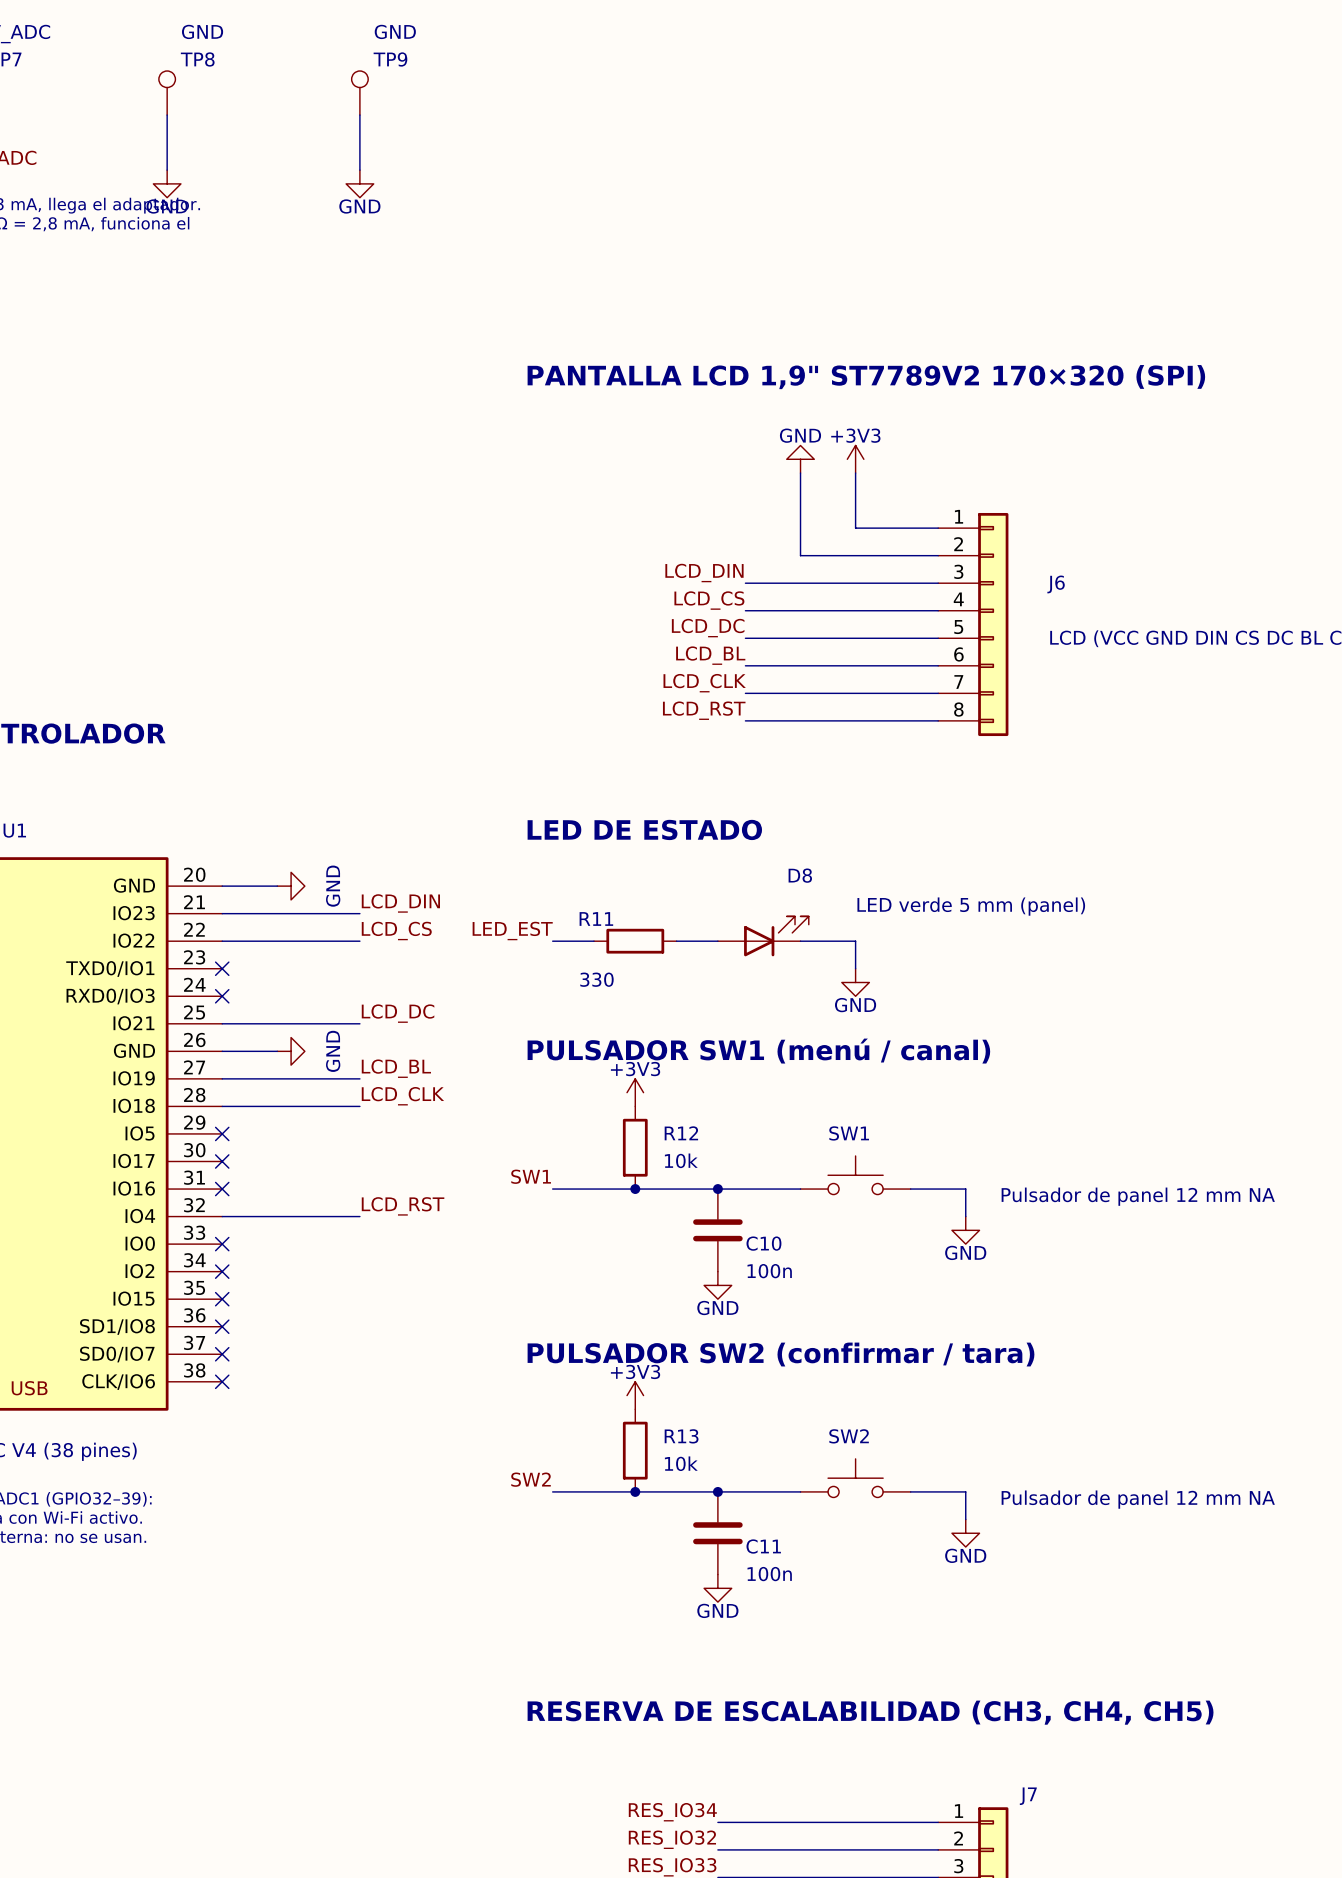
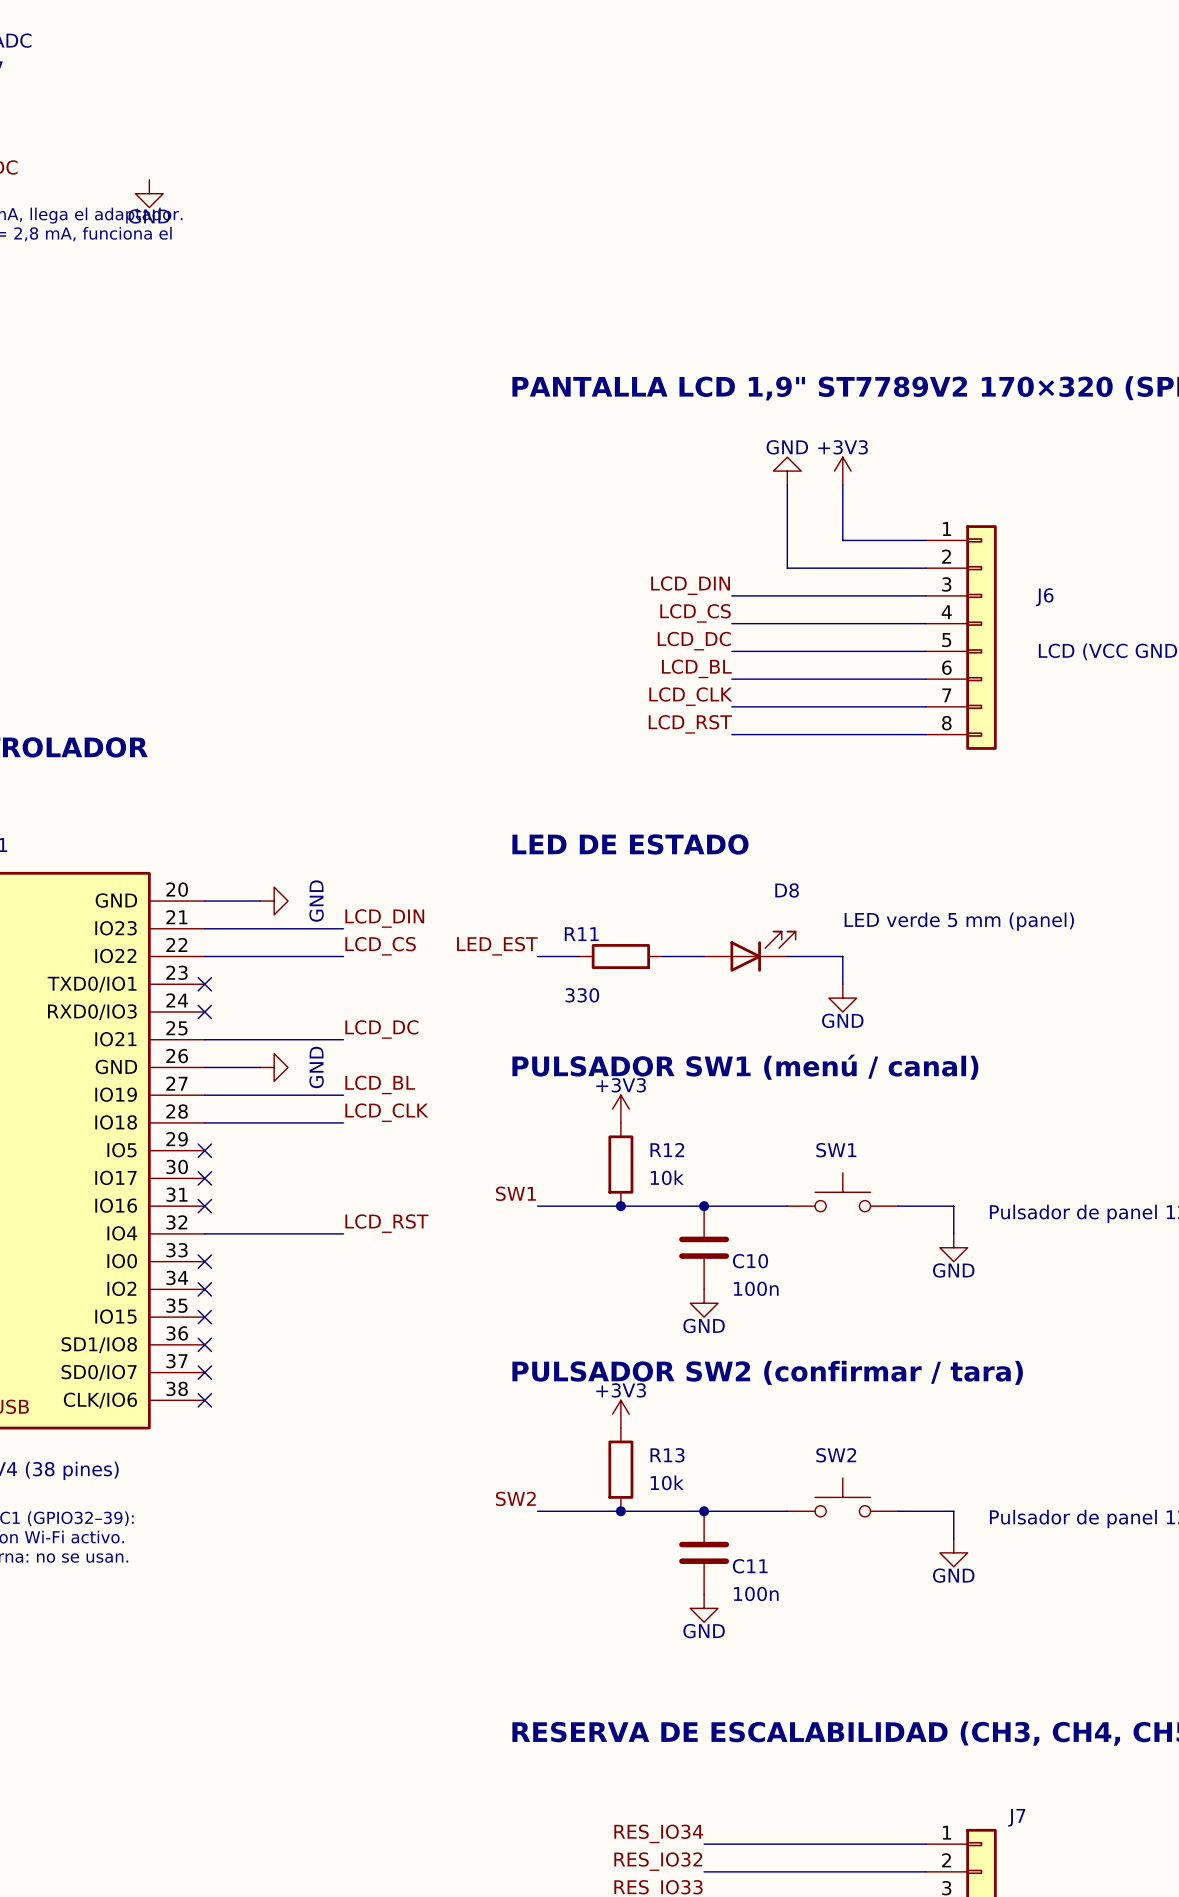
TP8: GND (167, 93) -> none
TP9: GND (359, 93) -> none
wire: (167, 115) (167, 170) -> none
wire: (359, 115) (359, 170) -> none
power symbol: GND (359, 183) -> none

